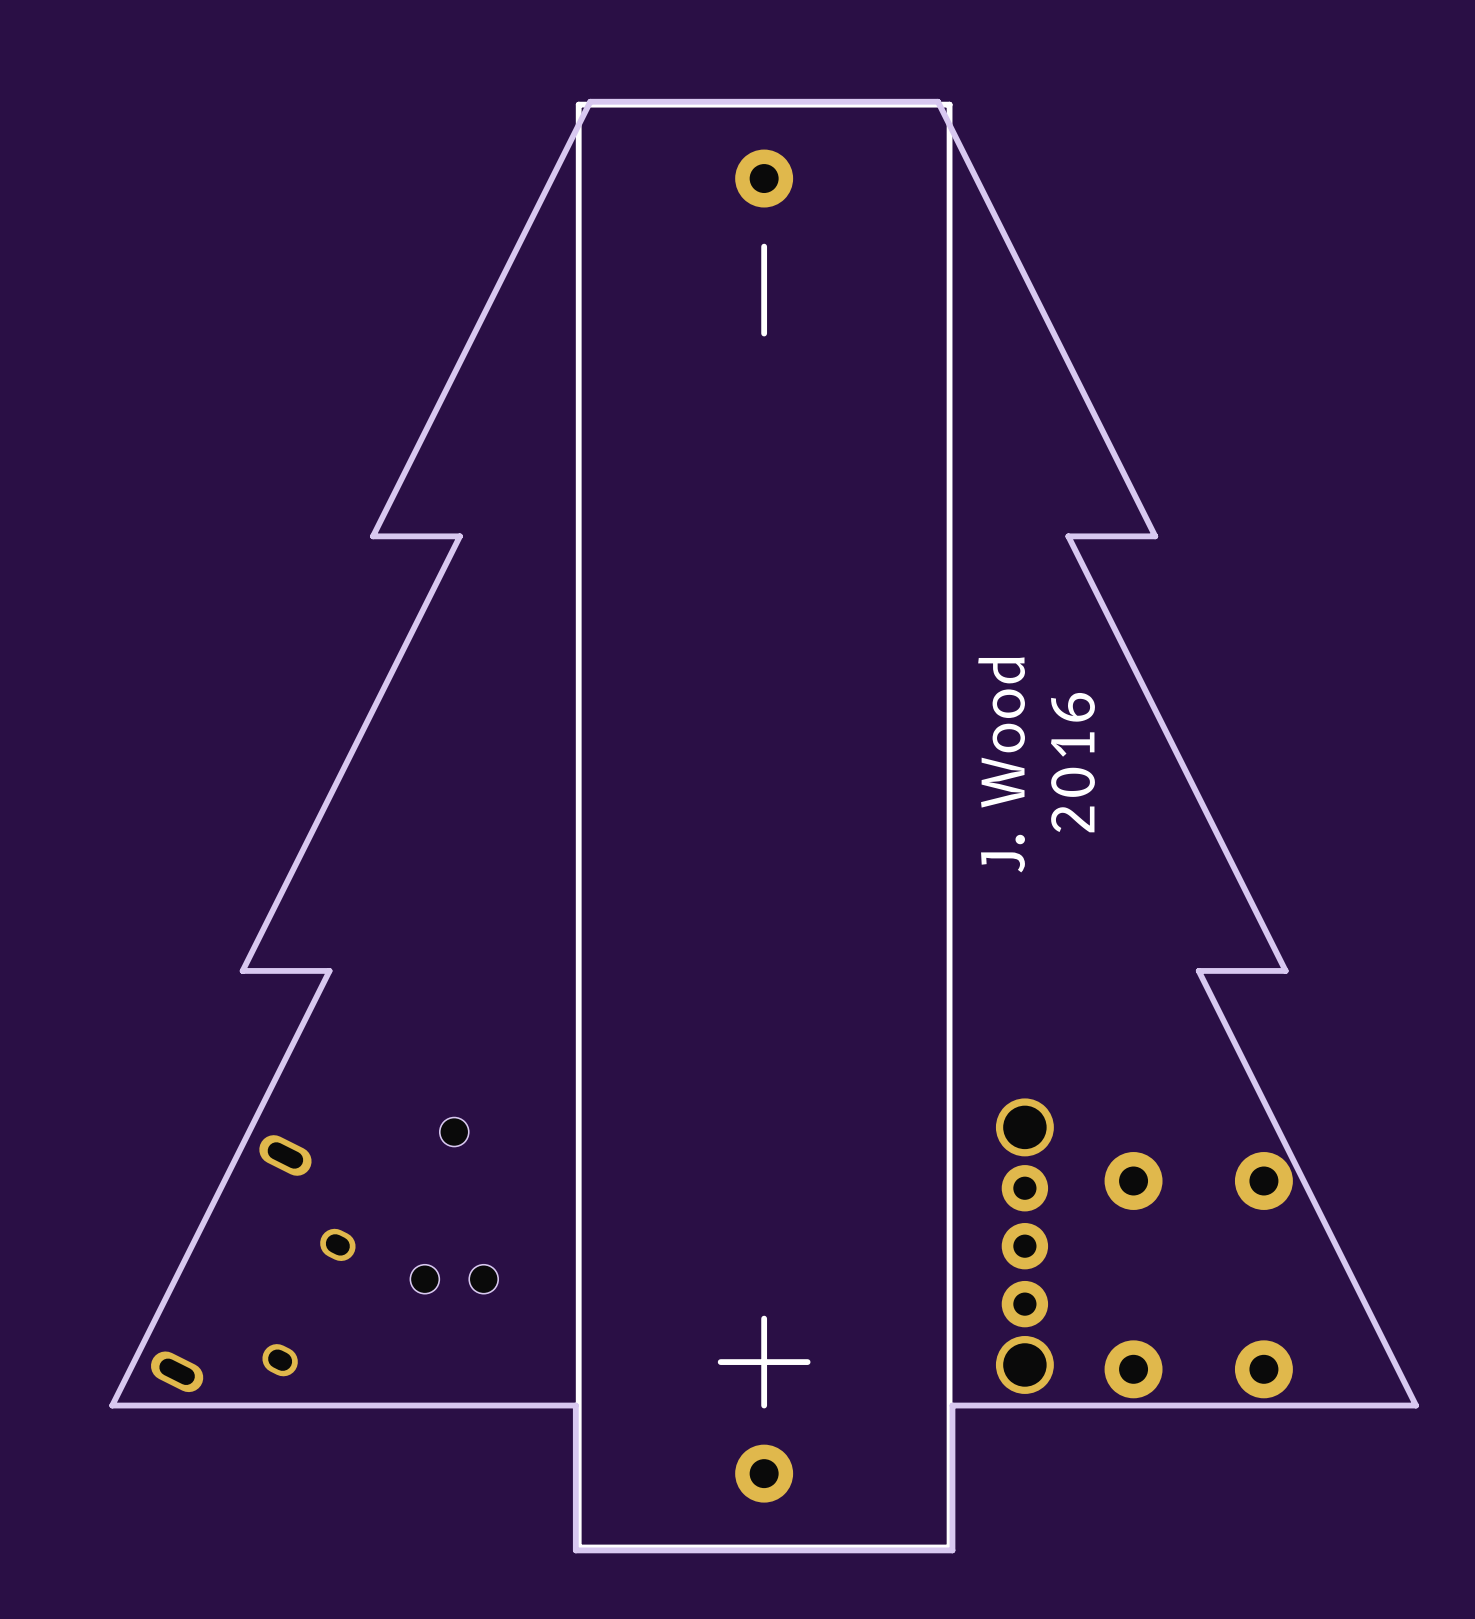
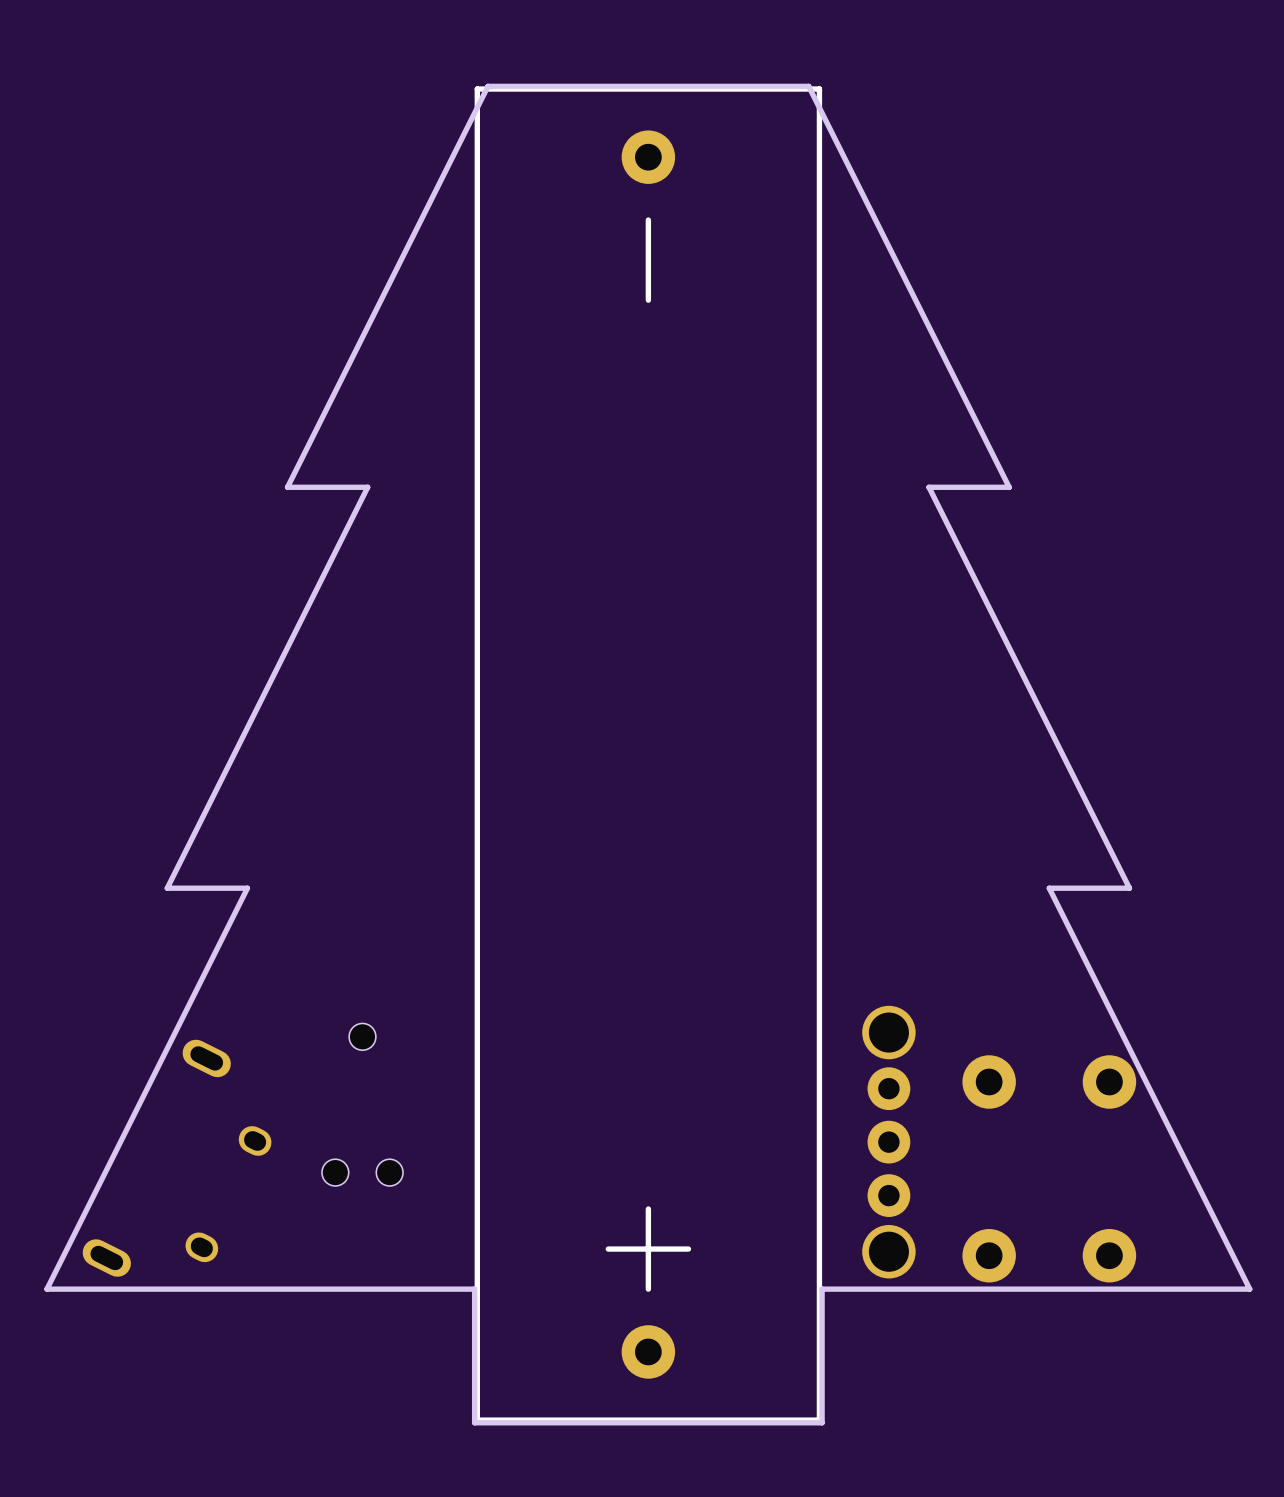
text: 2016 (1072, 762) -> none
text: J. Wood (1001, 764) -> none

